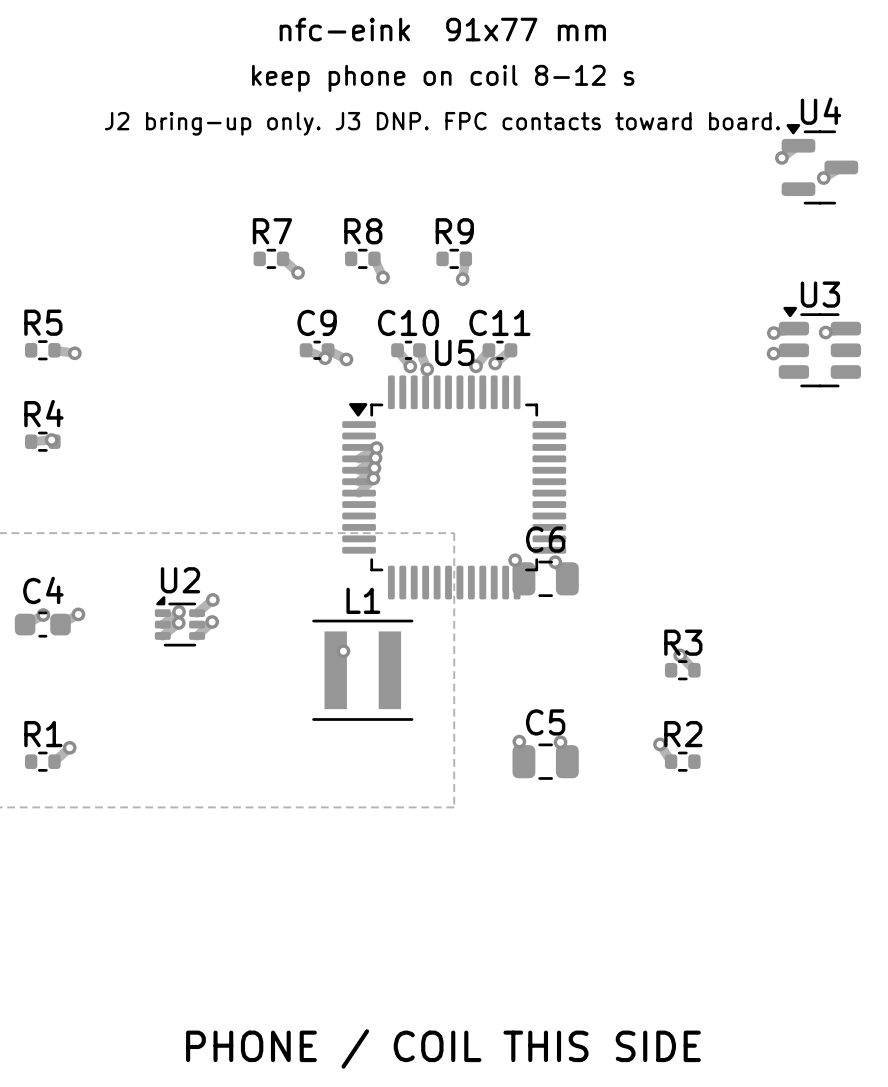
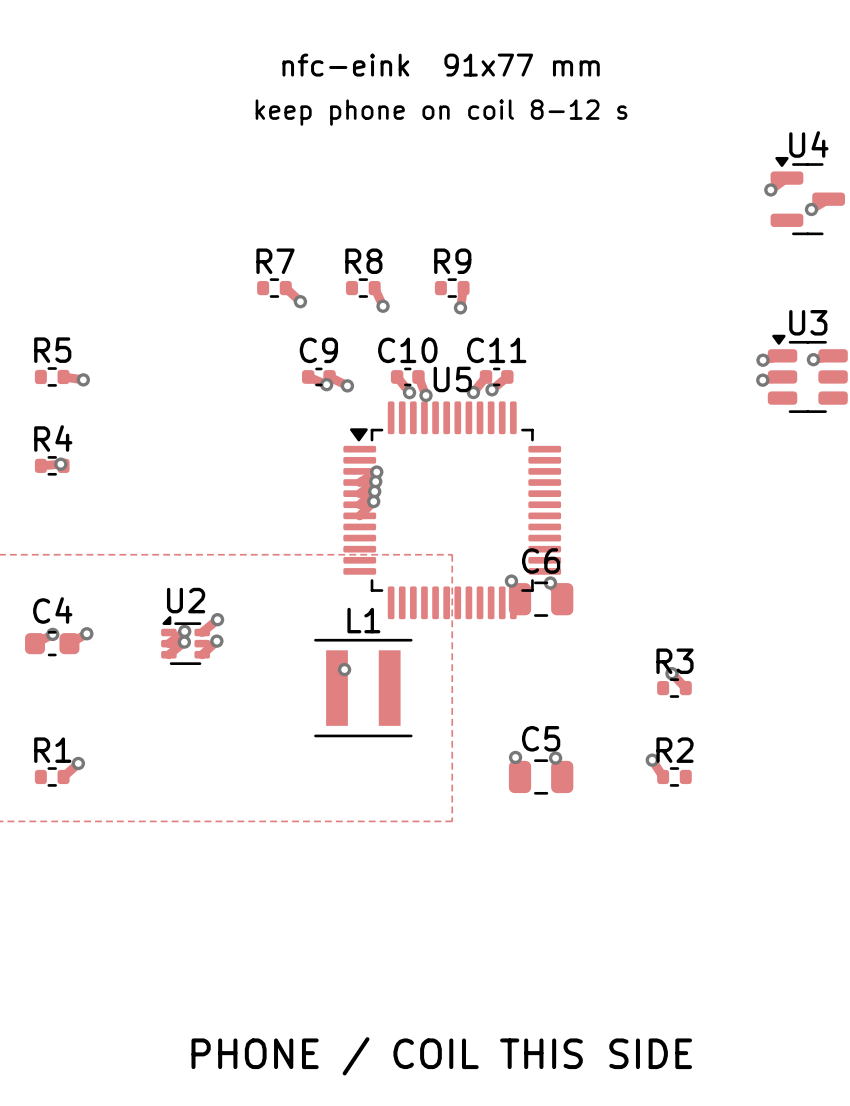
text: J2 bring-up only. J3 DNP. FPC contacts toward board. (442, 123) -> none

